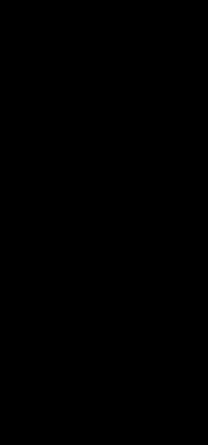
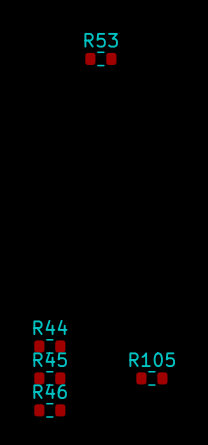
R53: none -> (100, 58)
R44: none -> (49, 346)
R45: none -> (49, 378)
R105: none -> (151, 378)
R46: none -> (49, 410)

